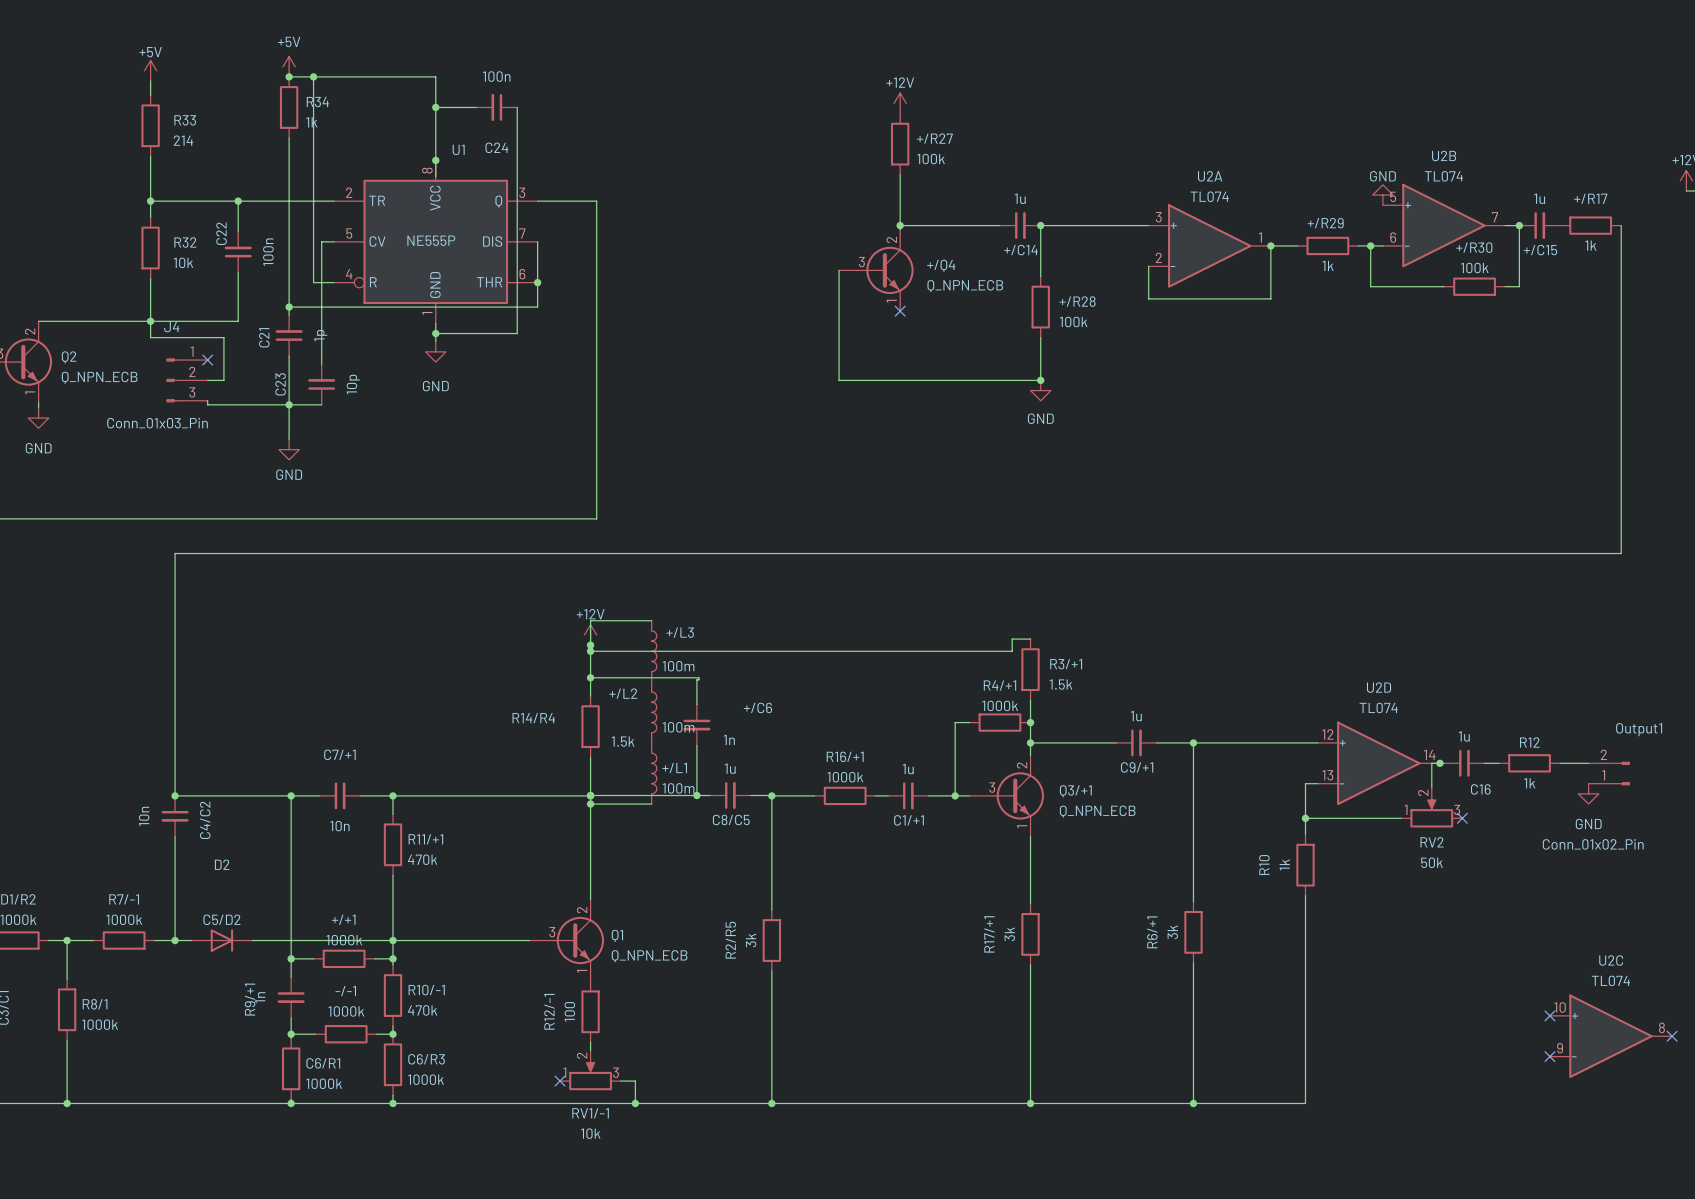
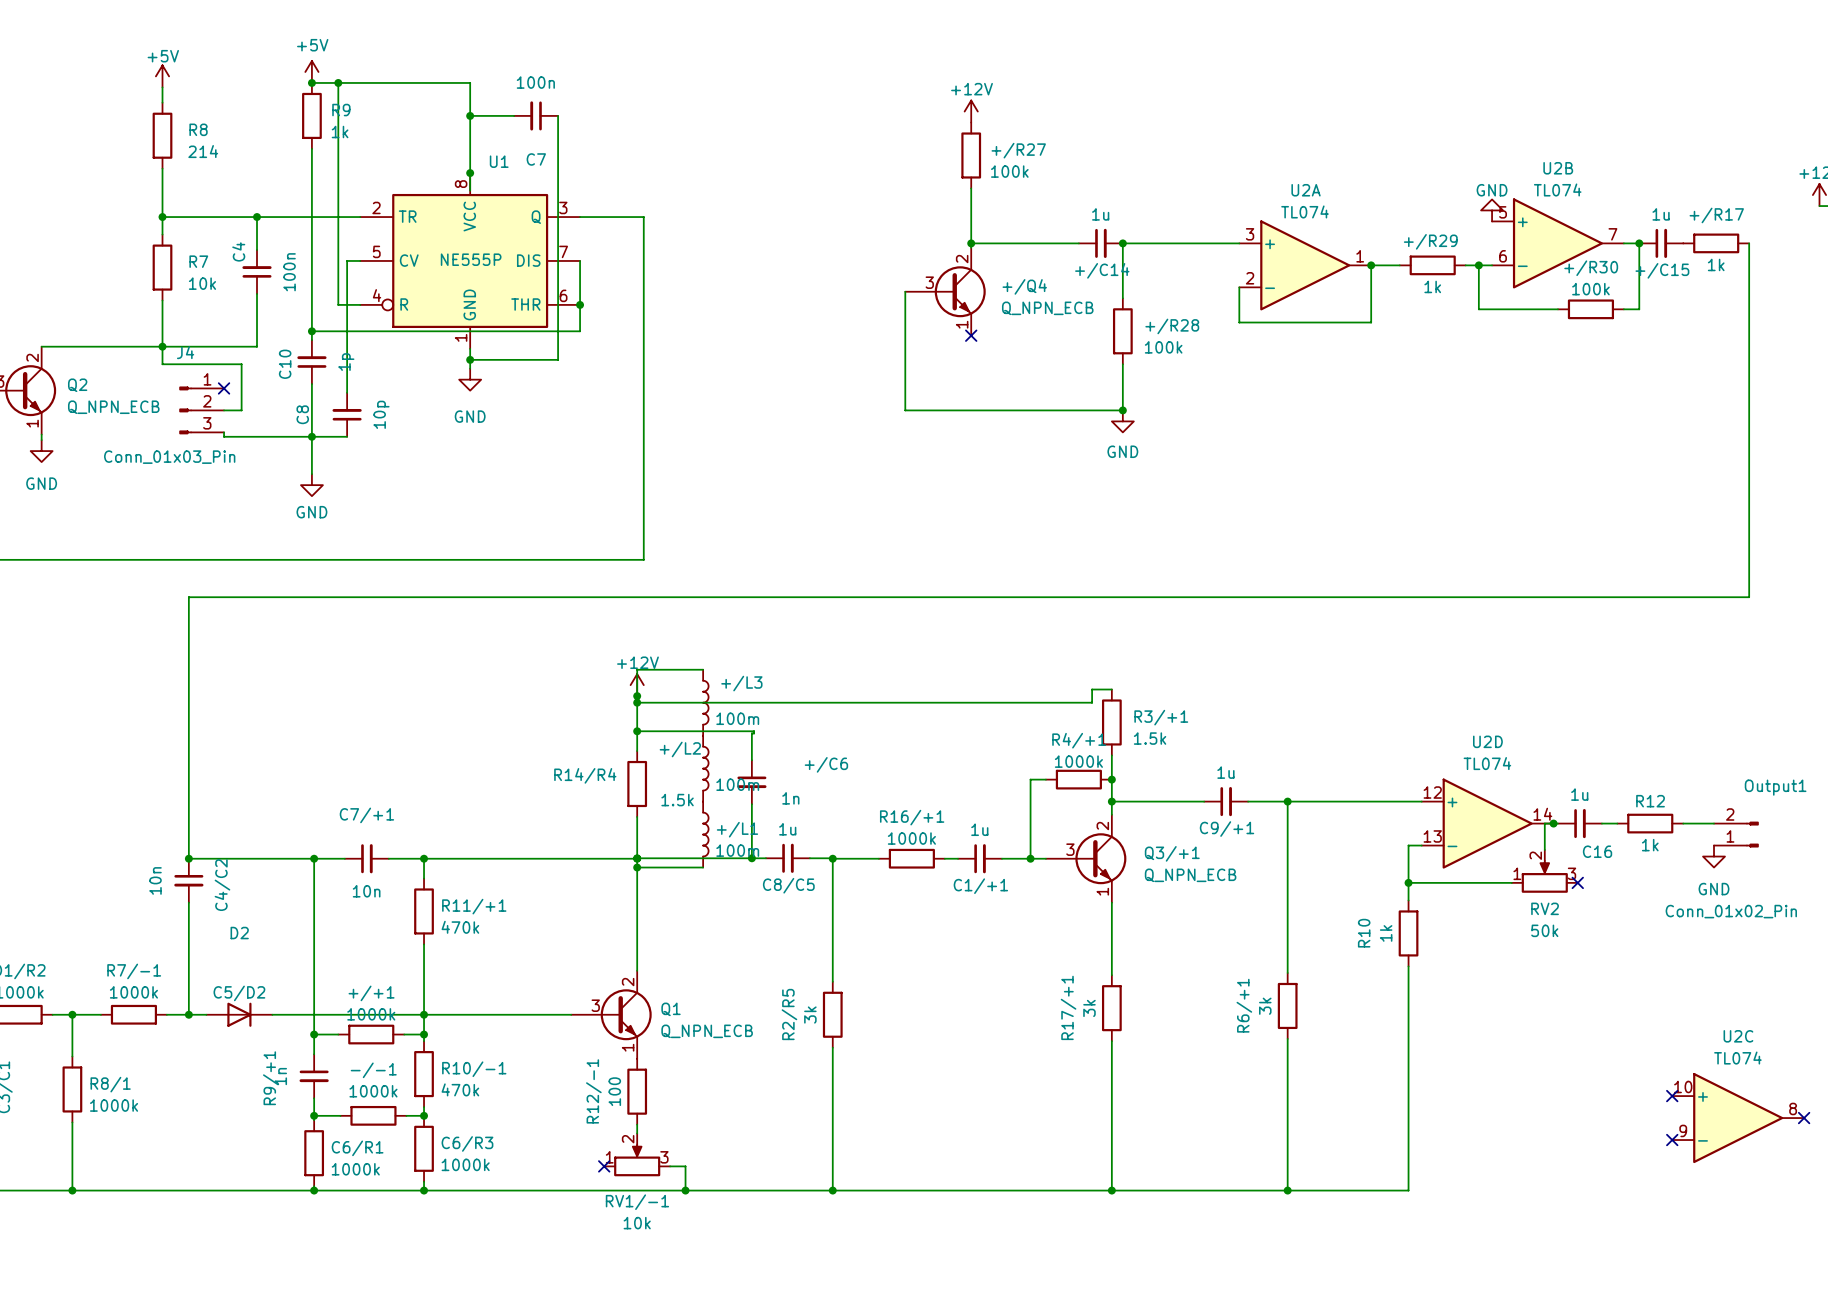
R34 name: R34 (317, 102) -> R9 (341, 110)
R33 name: R33 (185, 120) -> R8 (198, 129)
C24 name: C24 (496, 147) -> C7 (536, 159)
C22 name: C22 (221, 233) -> C4 (238, 251)
R32 name: R32 (185, 242) -> R7 (198, 261)
C21 name: C21 (264, 337) -> C10 (285, 364)
C23 name: C23 (280, 384) -> C8 (302, 414)

